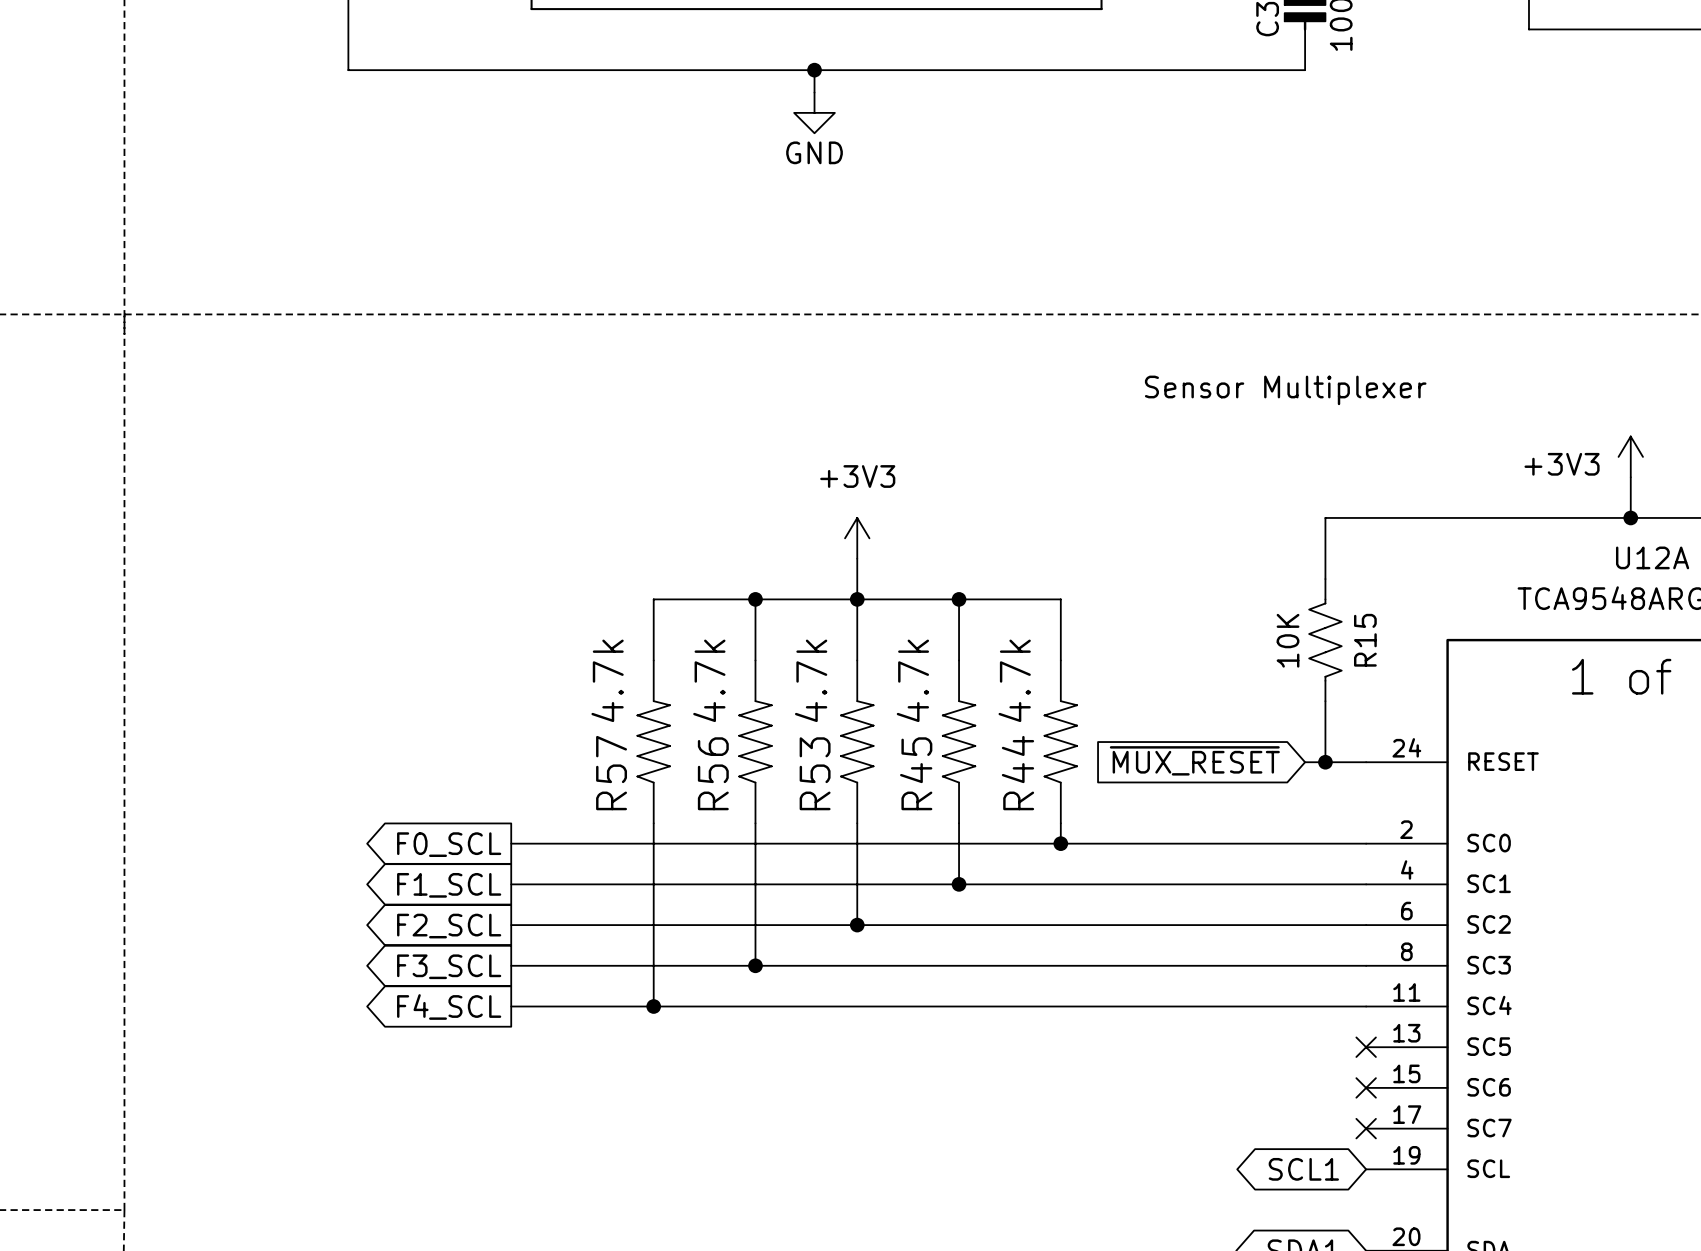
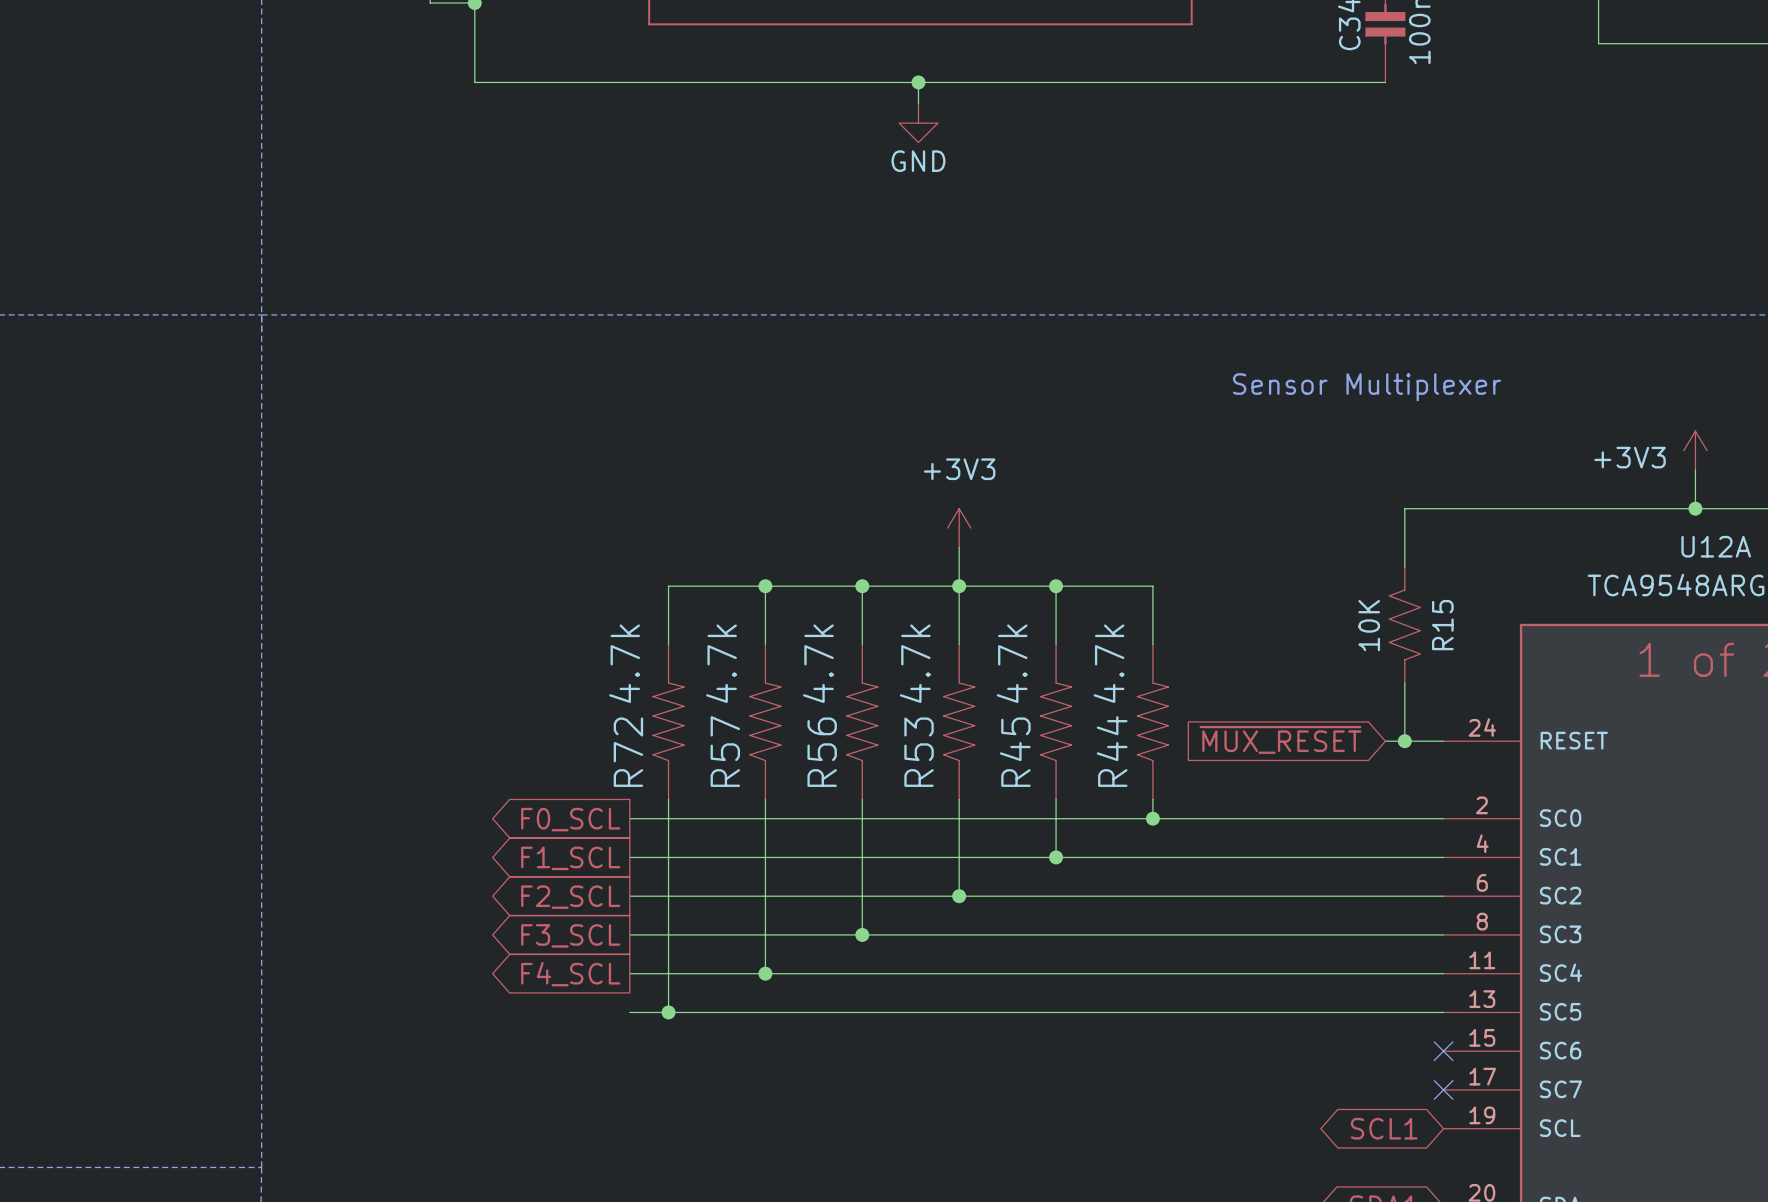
wire: none -> (765, 586) (668, 586) (668, 644)
junction: none -> (765, 586)
R72: none -> 4.7k (668, 721)
wire: none -> (668, 799) (668, 1012)
wire: none -> (629, 1012) (1443, 1012)
junction: none -> (668, 1012)
no-connect mark: (1366, 1047) -> none

